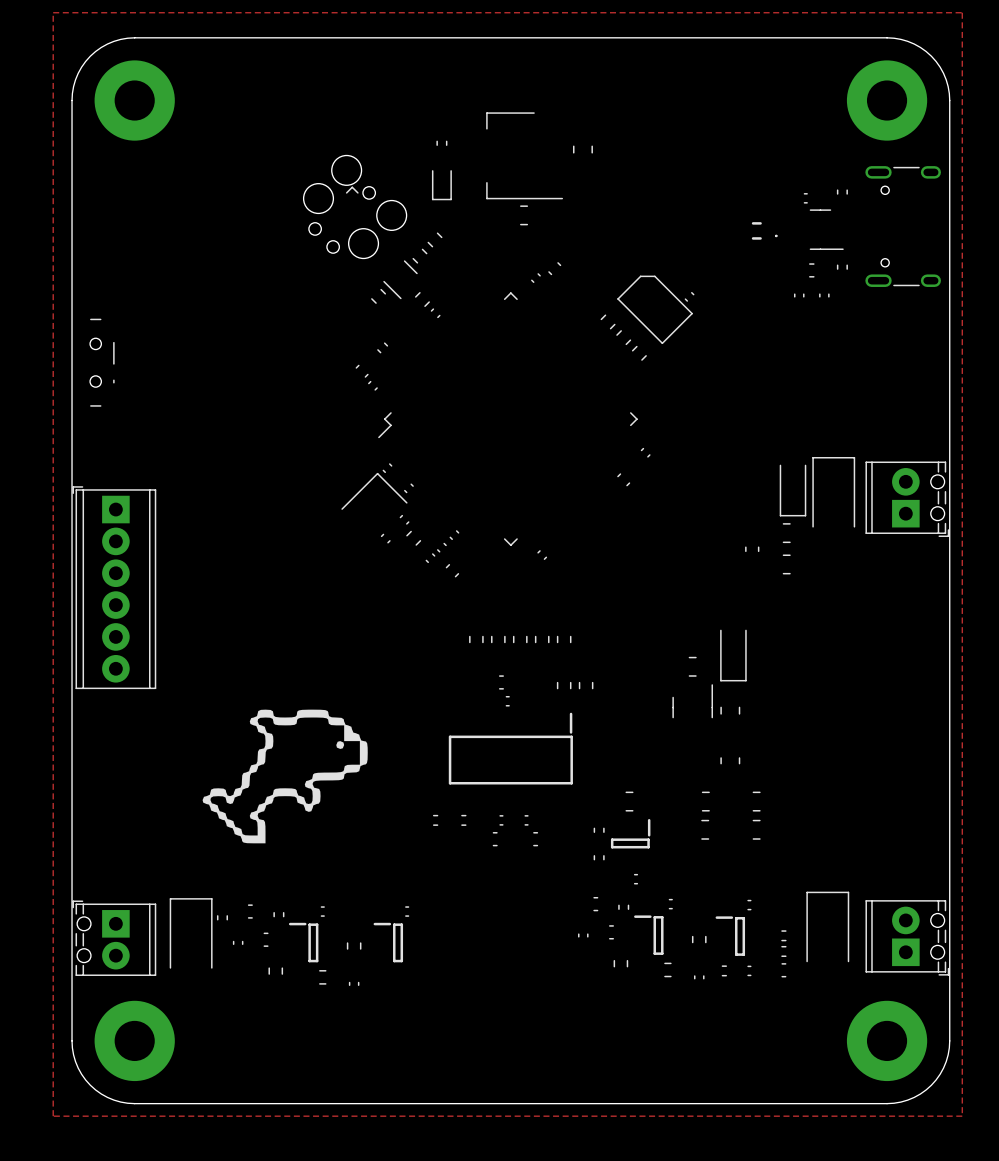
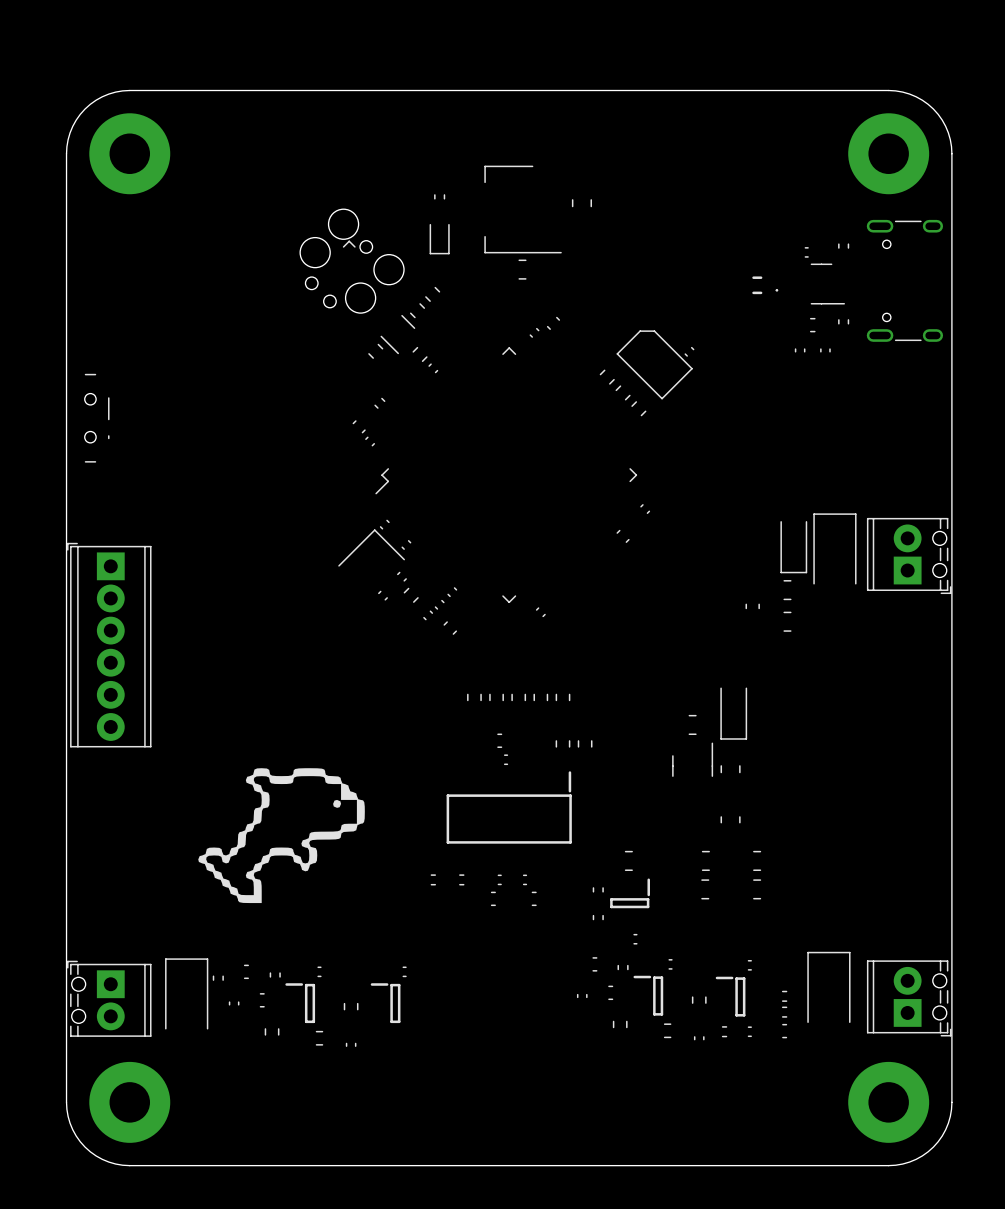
zone outline: (53, 12) (962, 12) (962, 1116) (53, 1116) (53, 12) -> none

